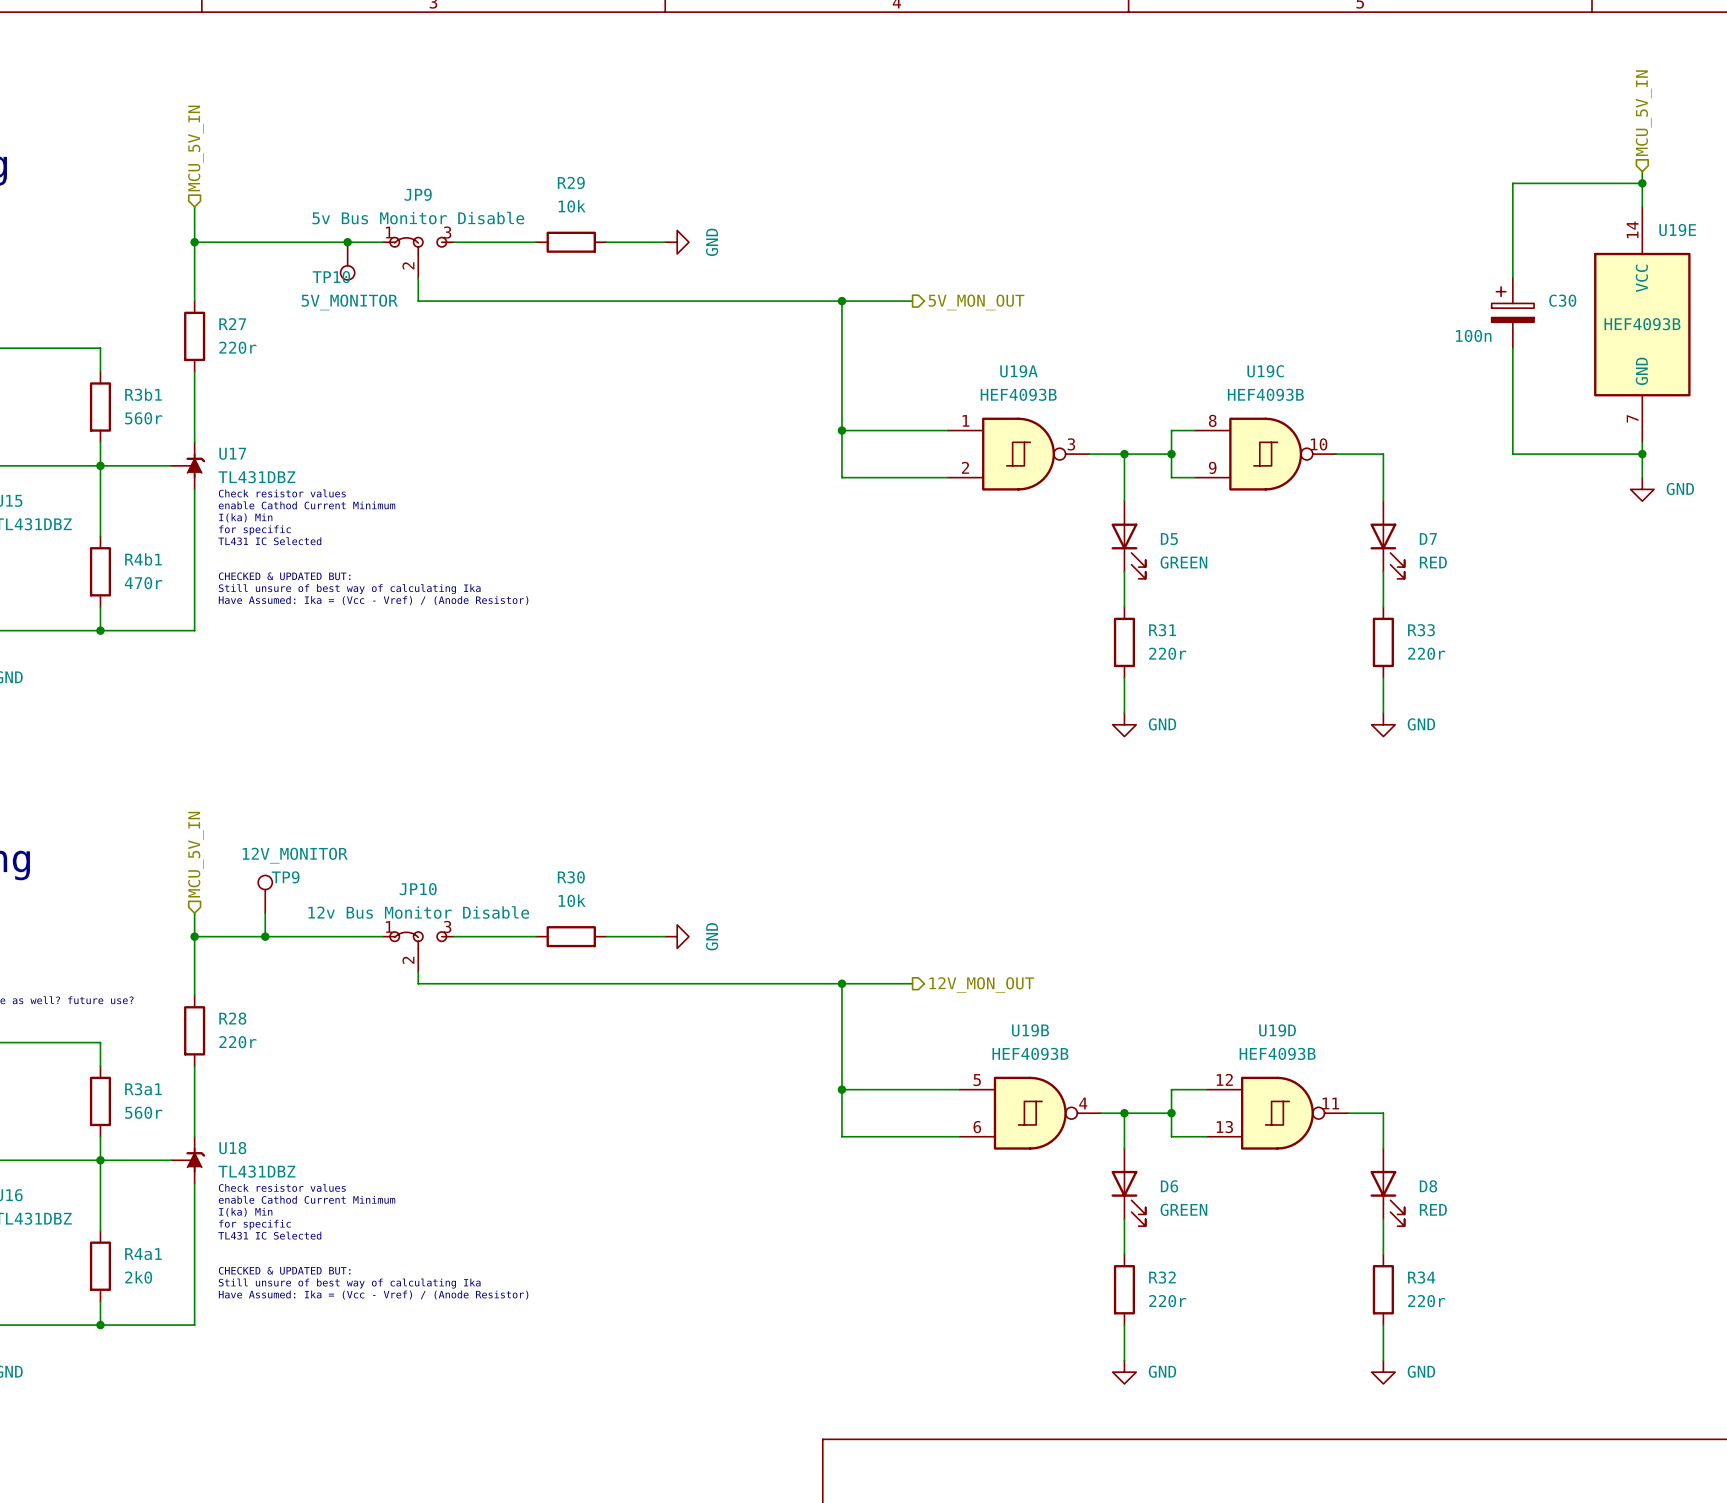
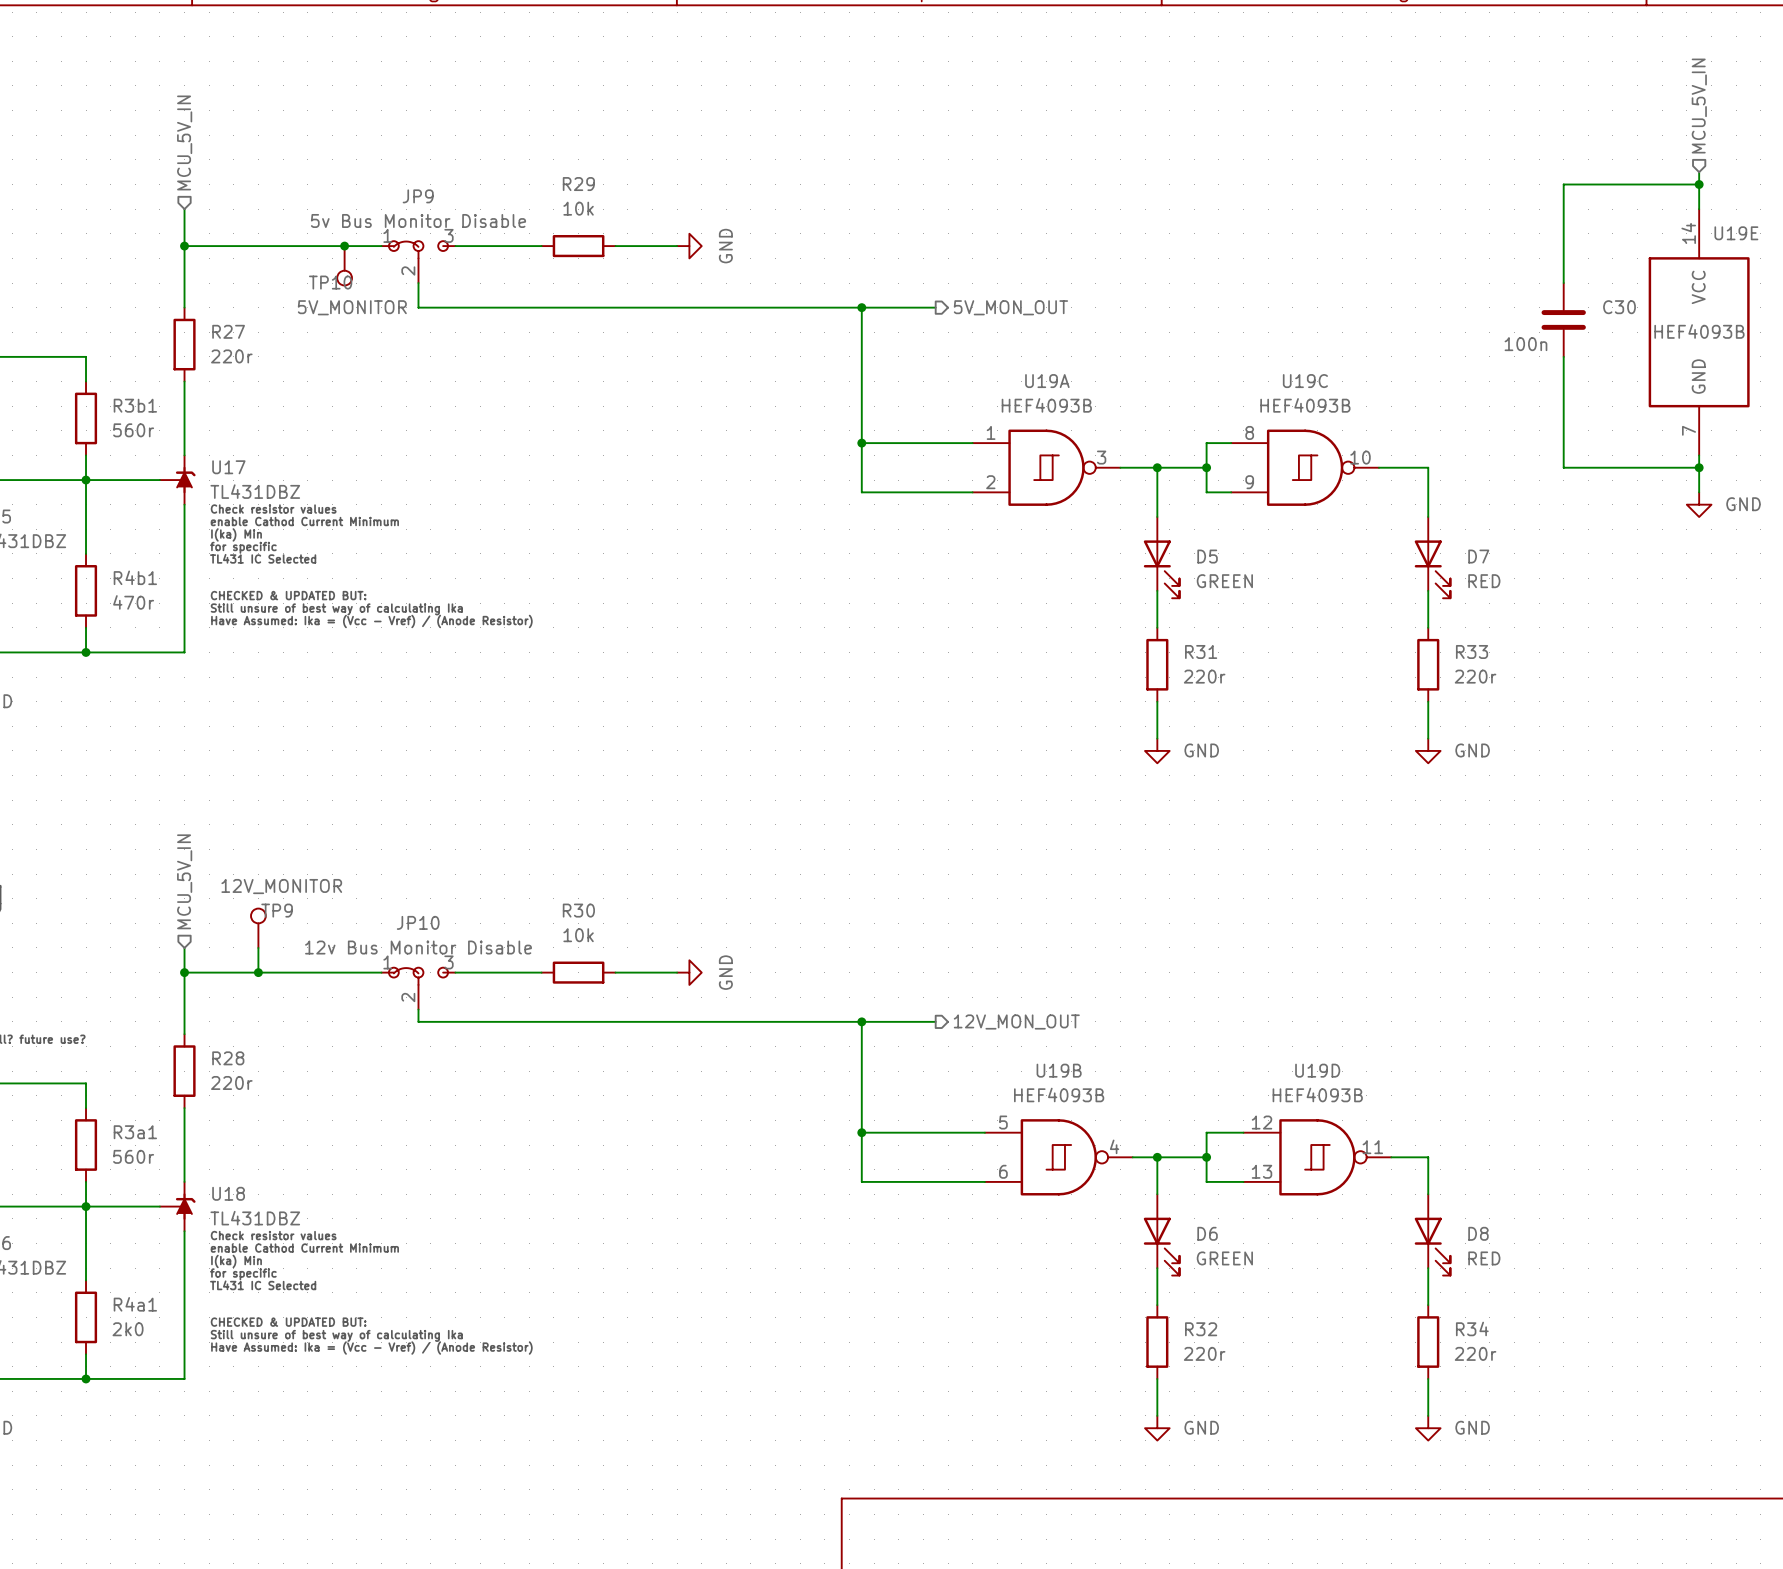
C30 symbol: [1491, 277, 1535, 349] -> [1541, 283, 1586, 357]

